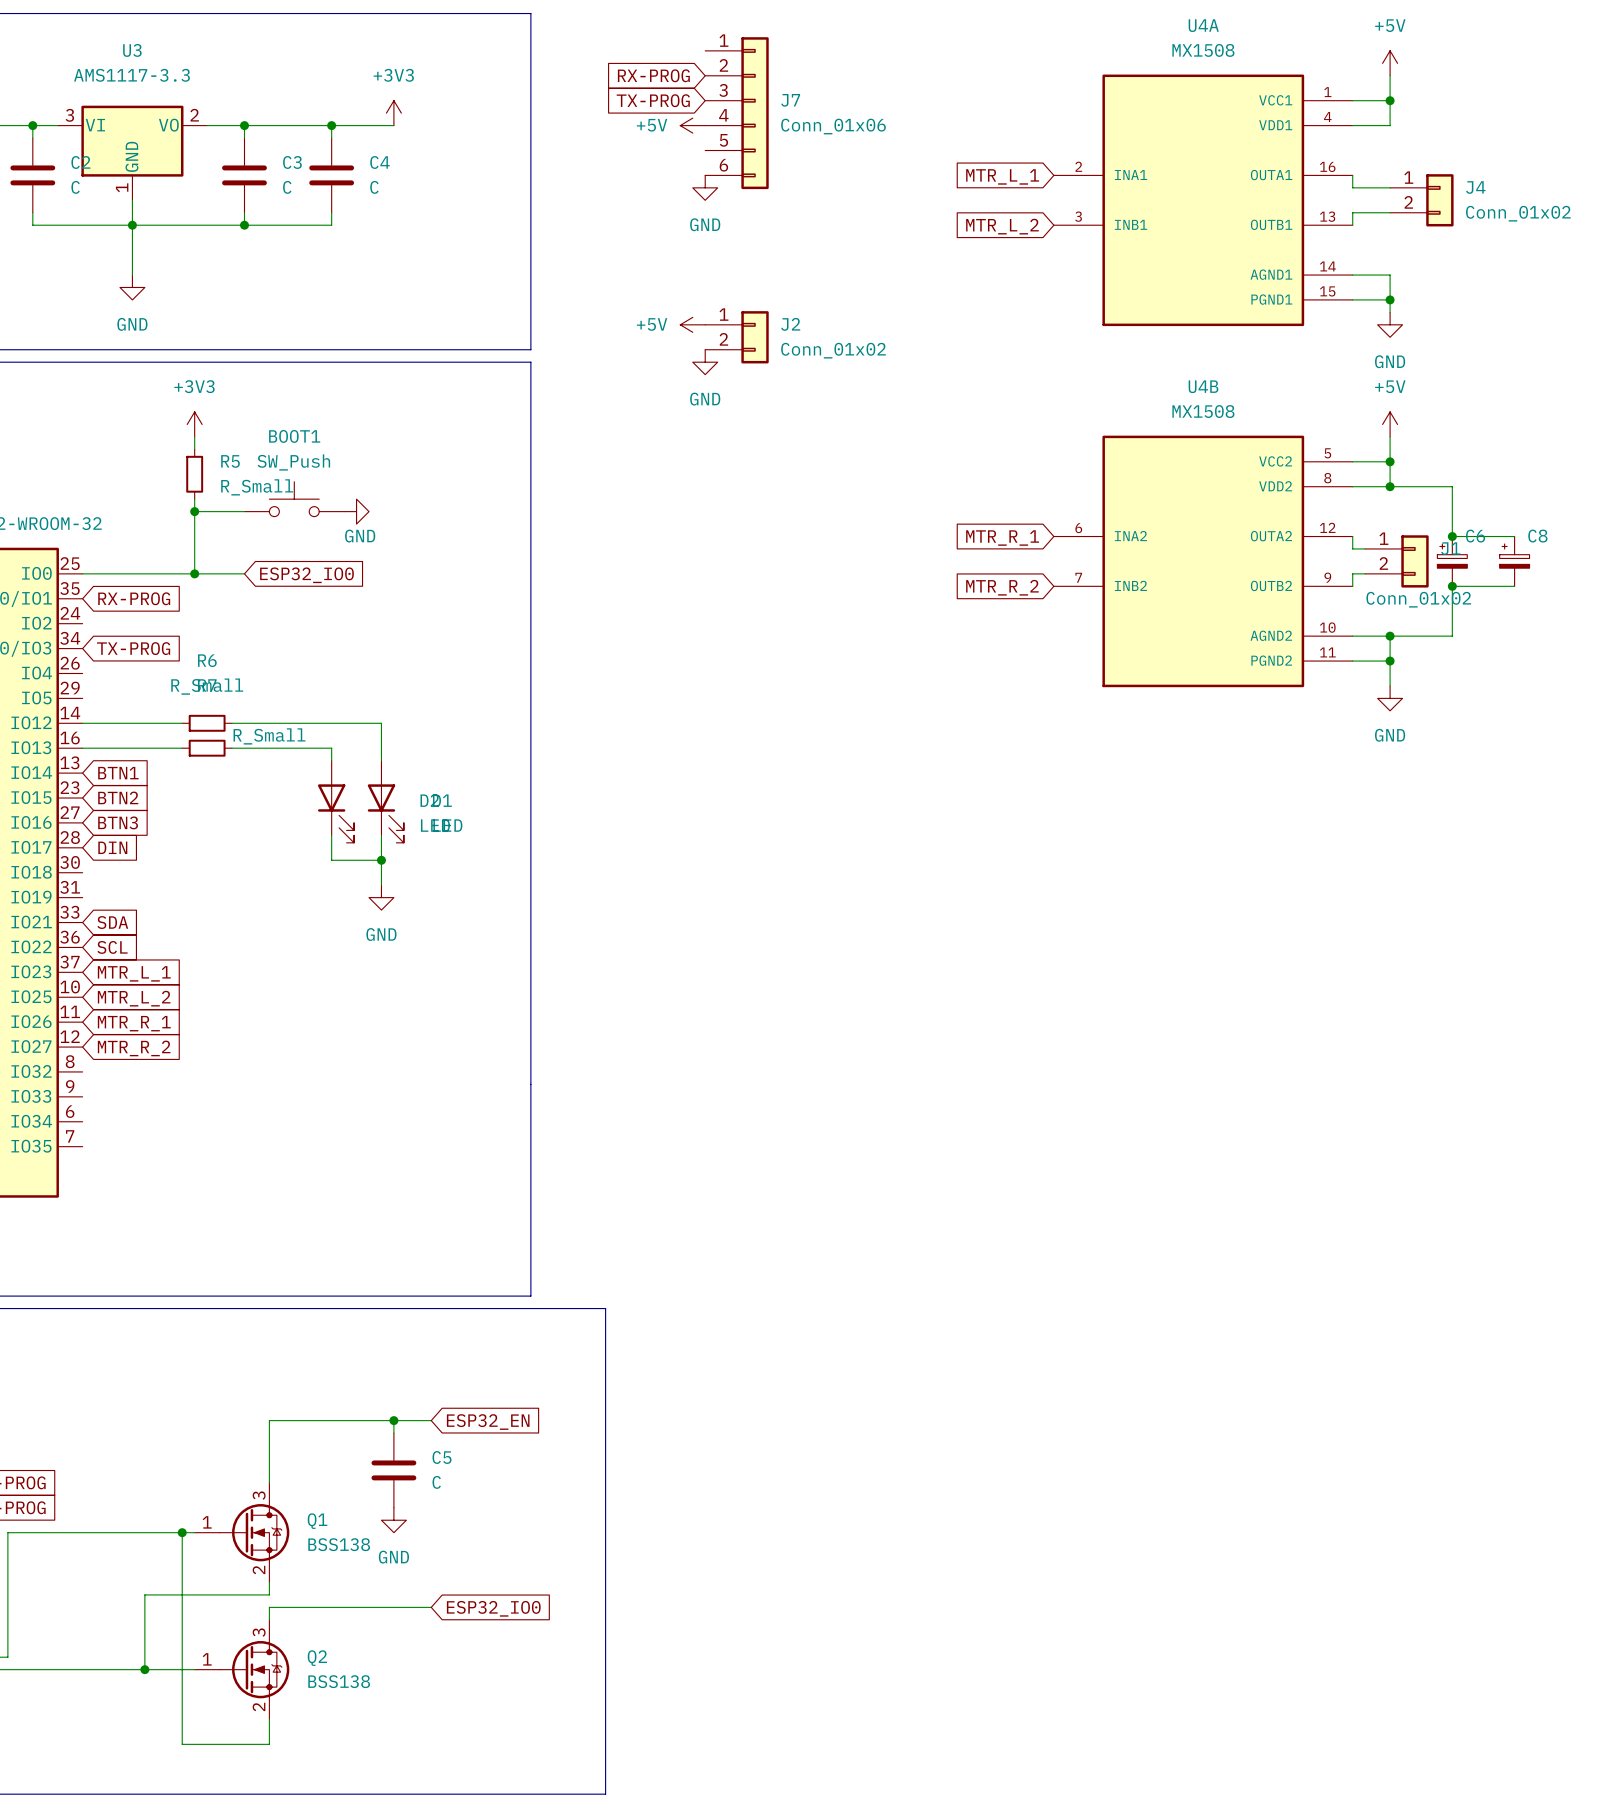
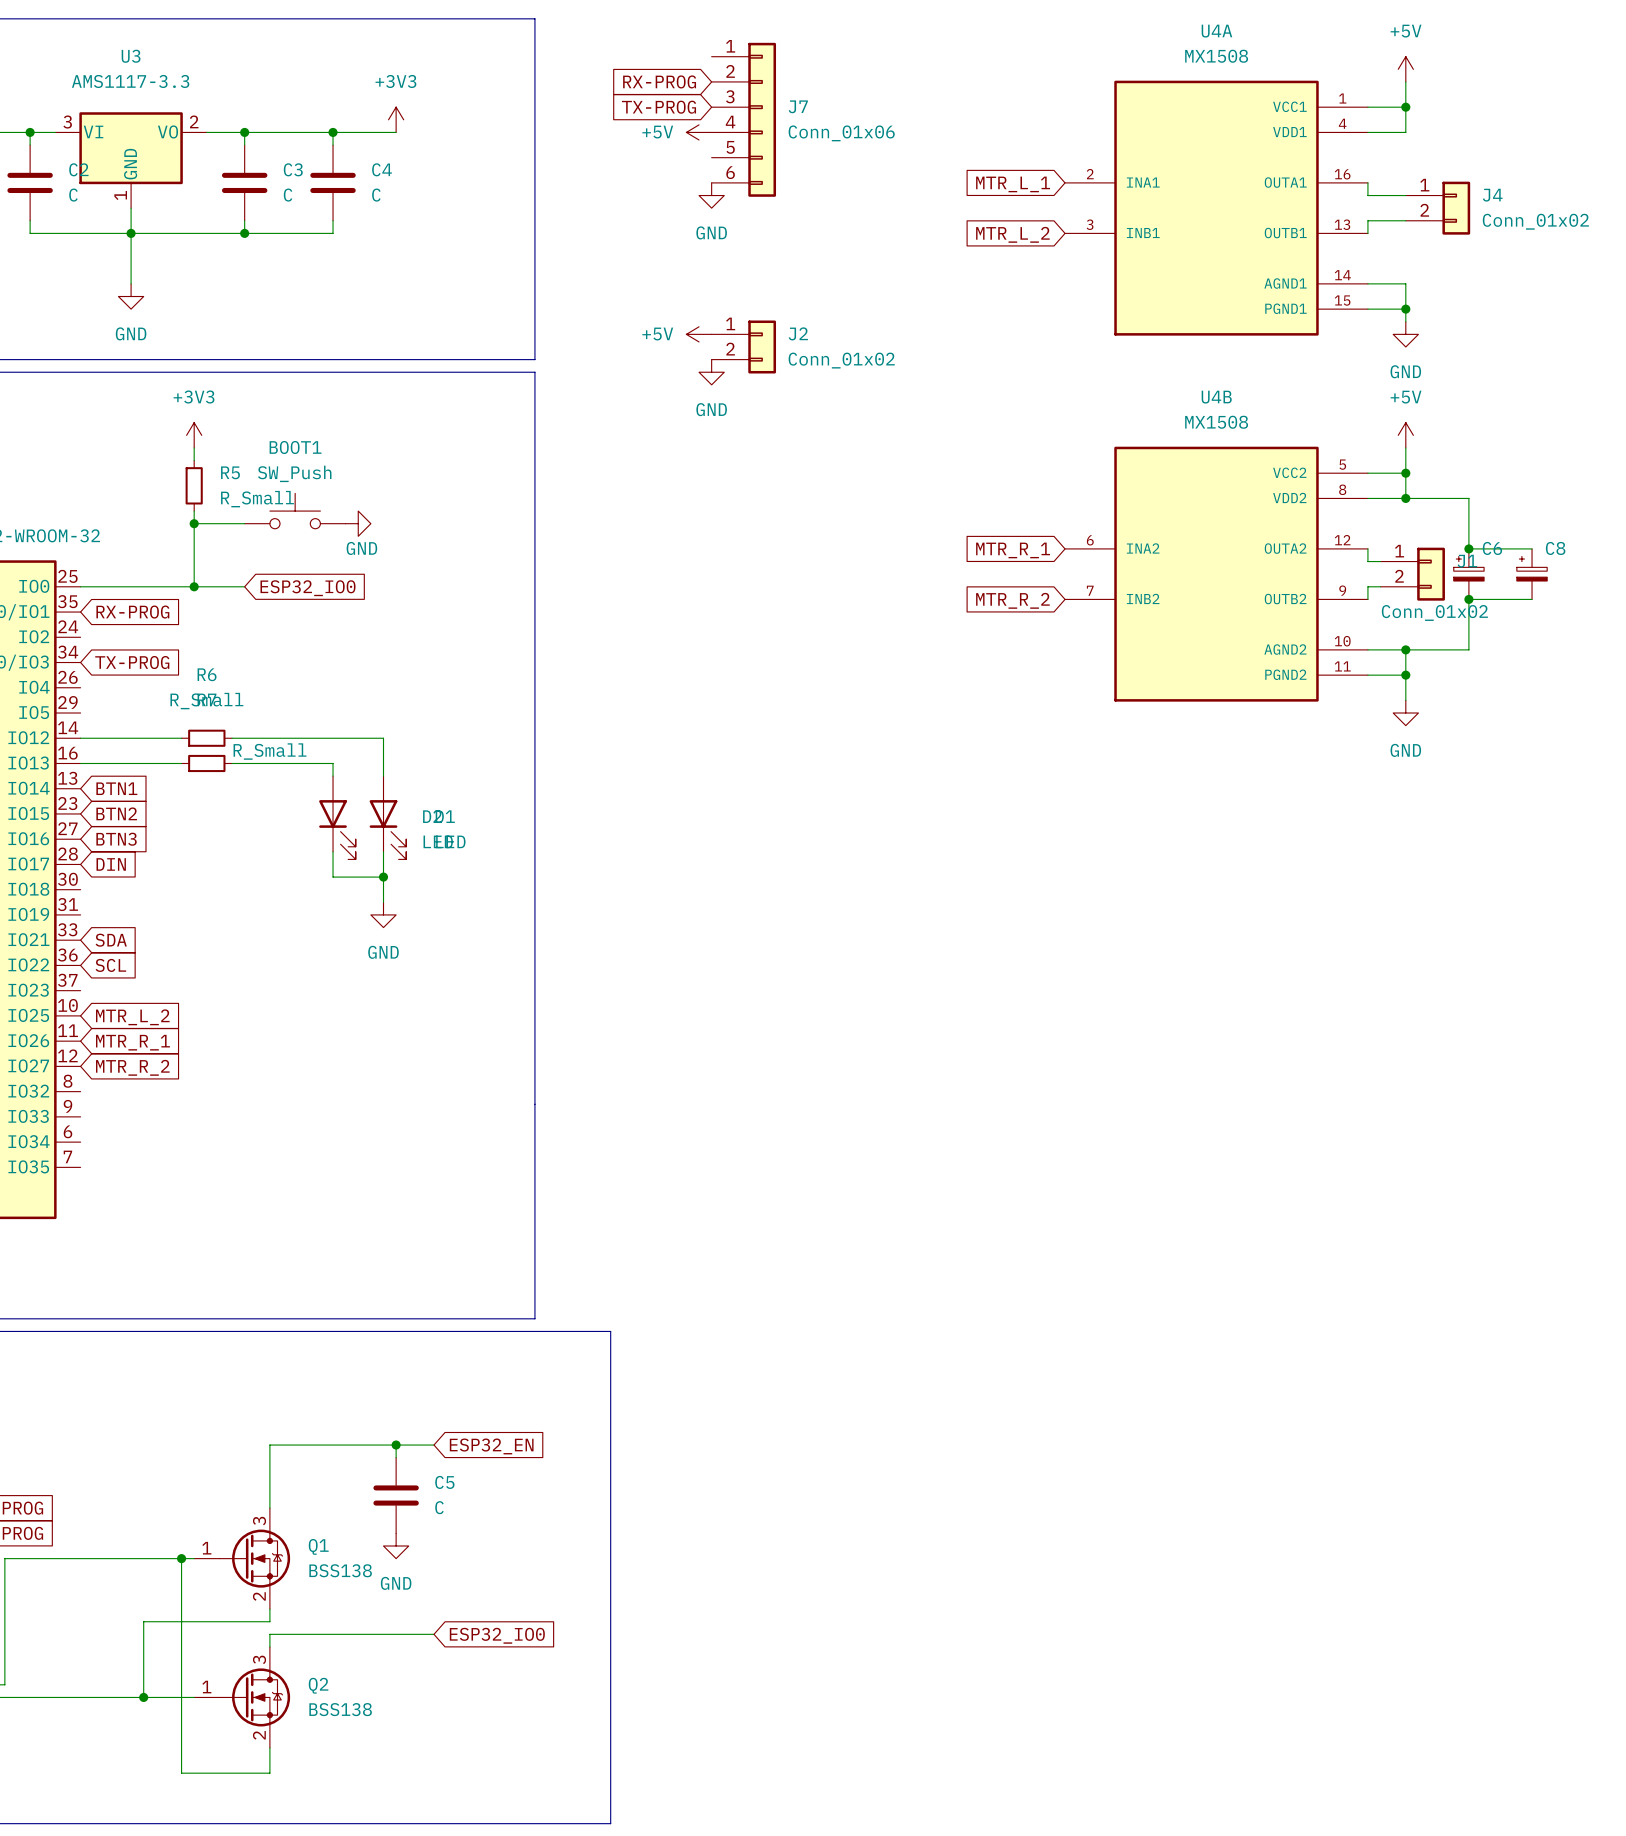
global label: MTR_L_1 (134, 973) -> none

